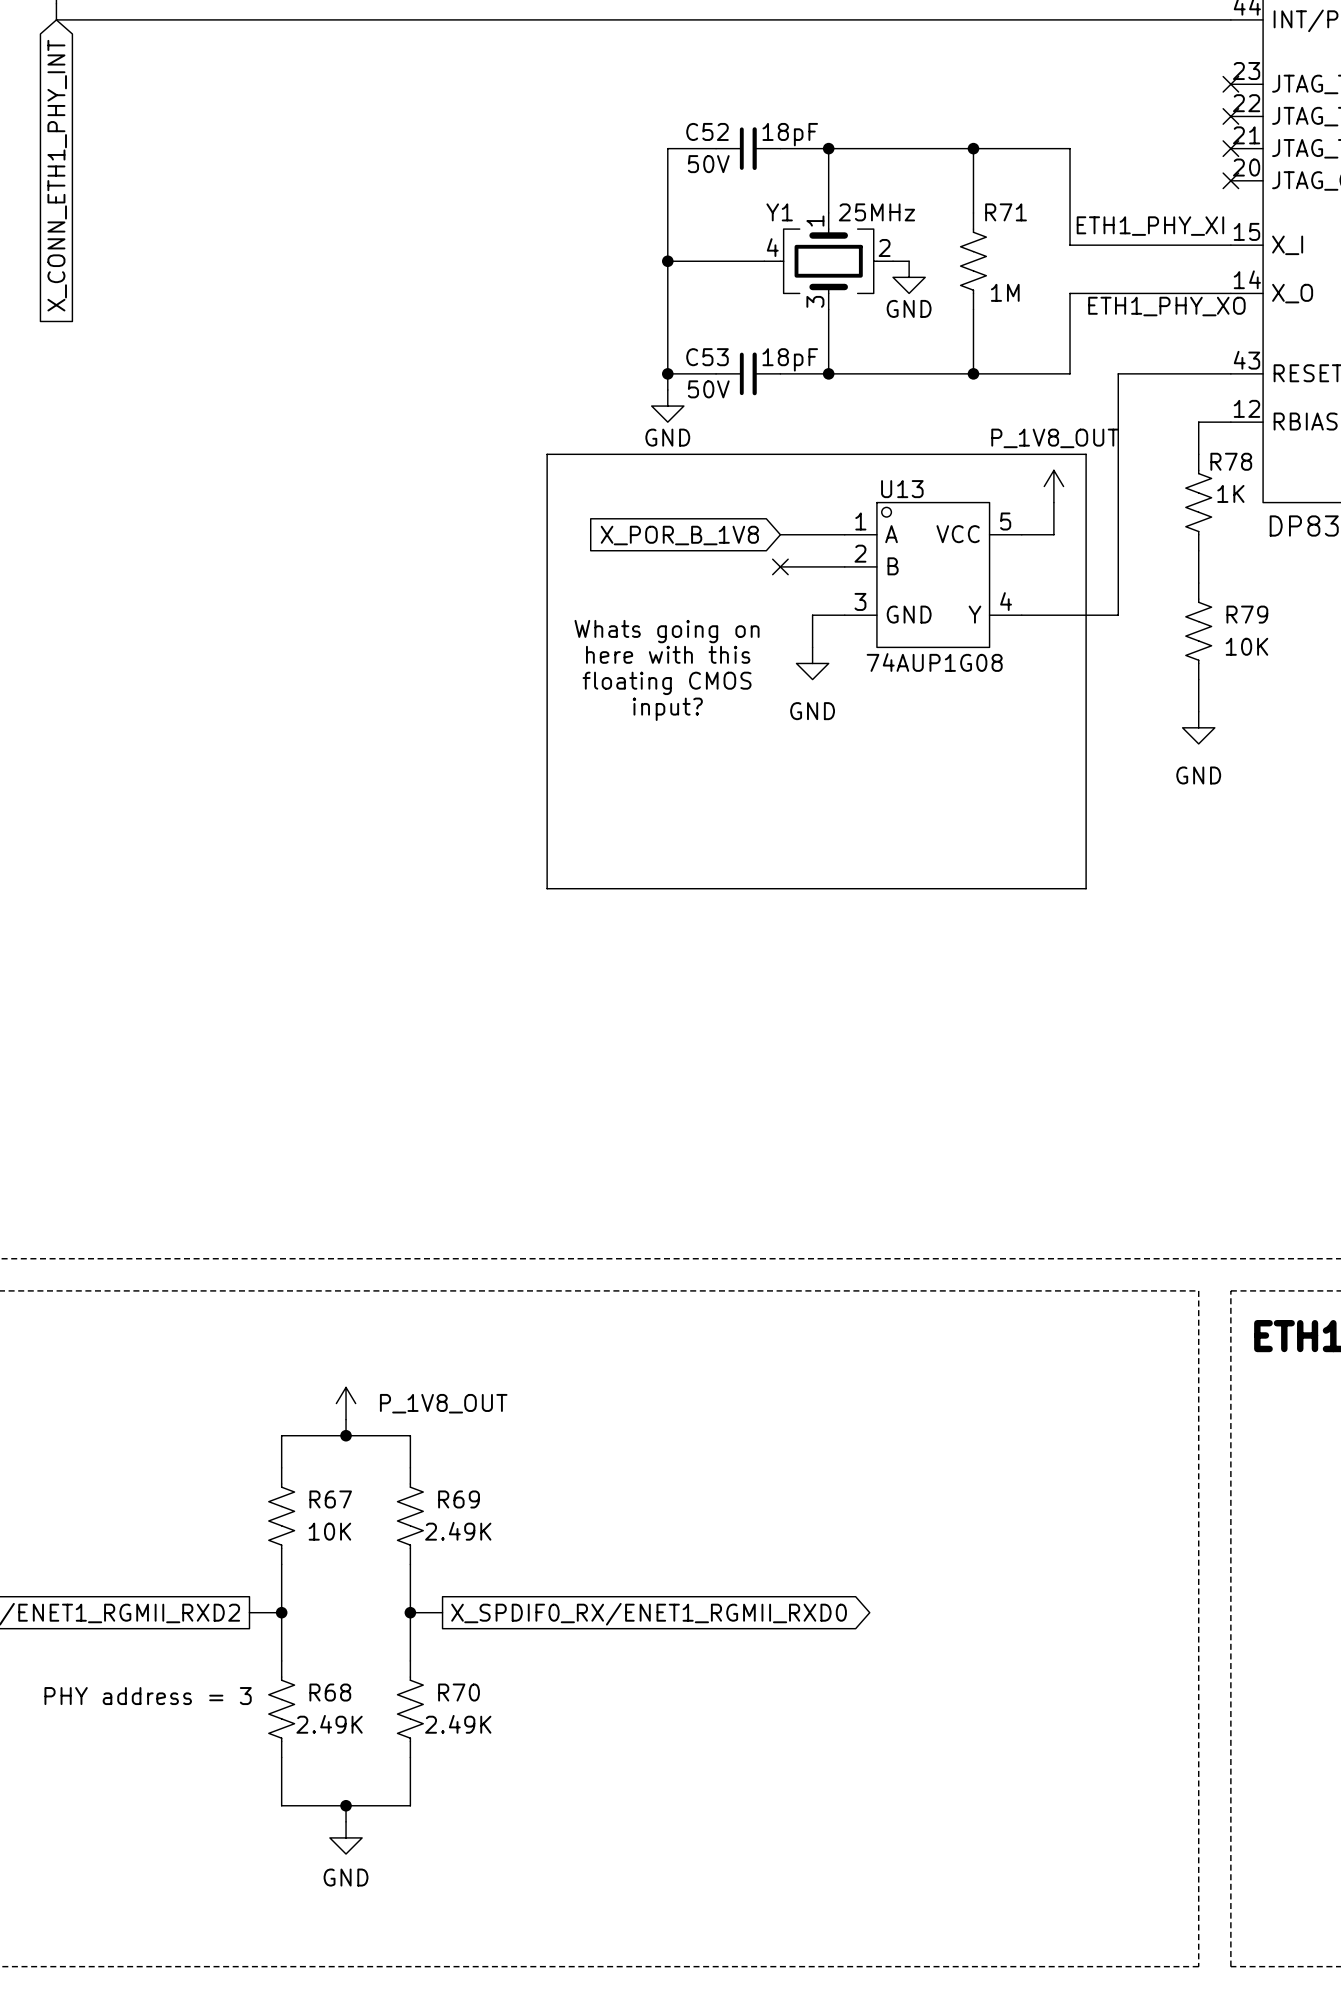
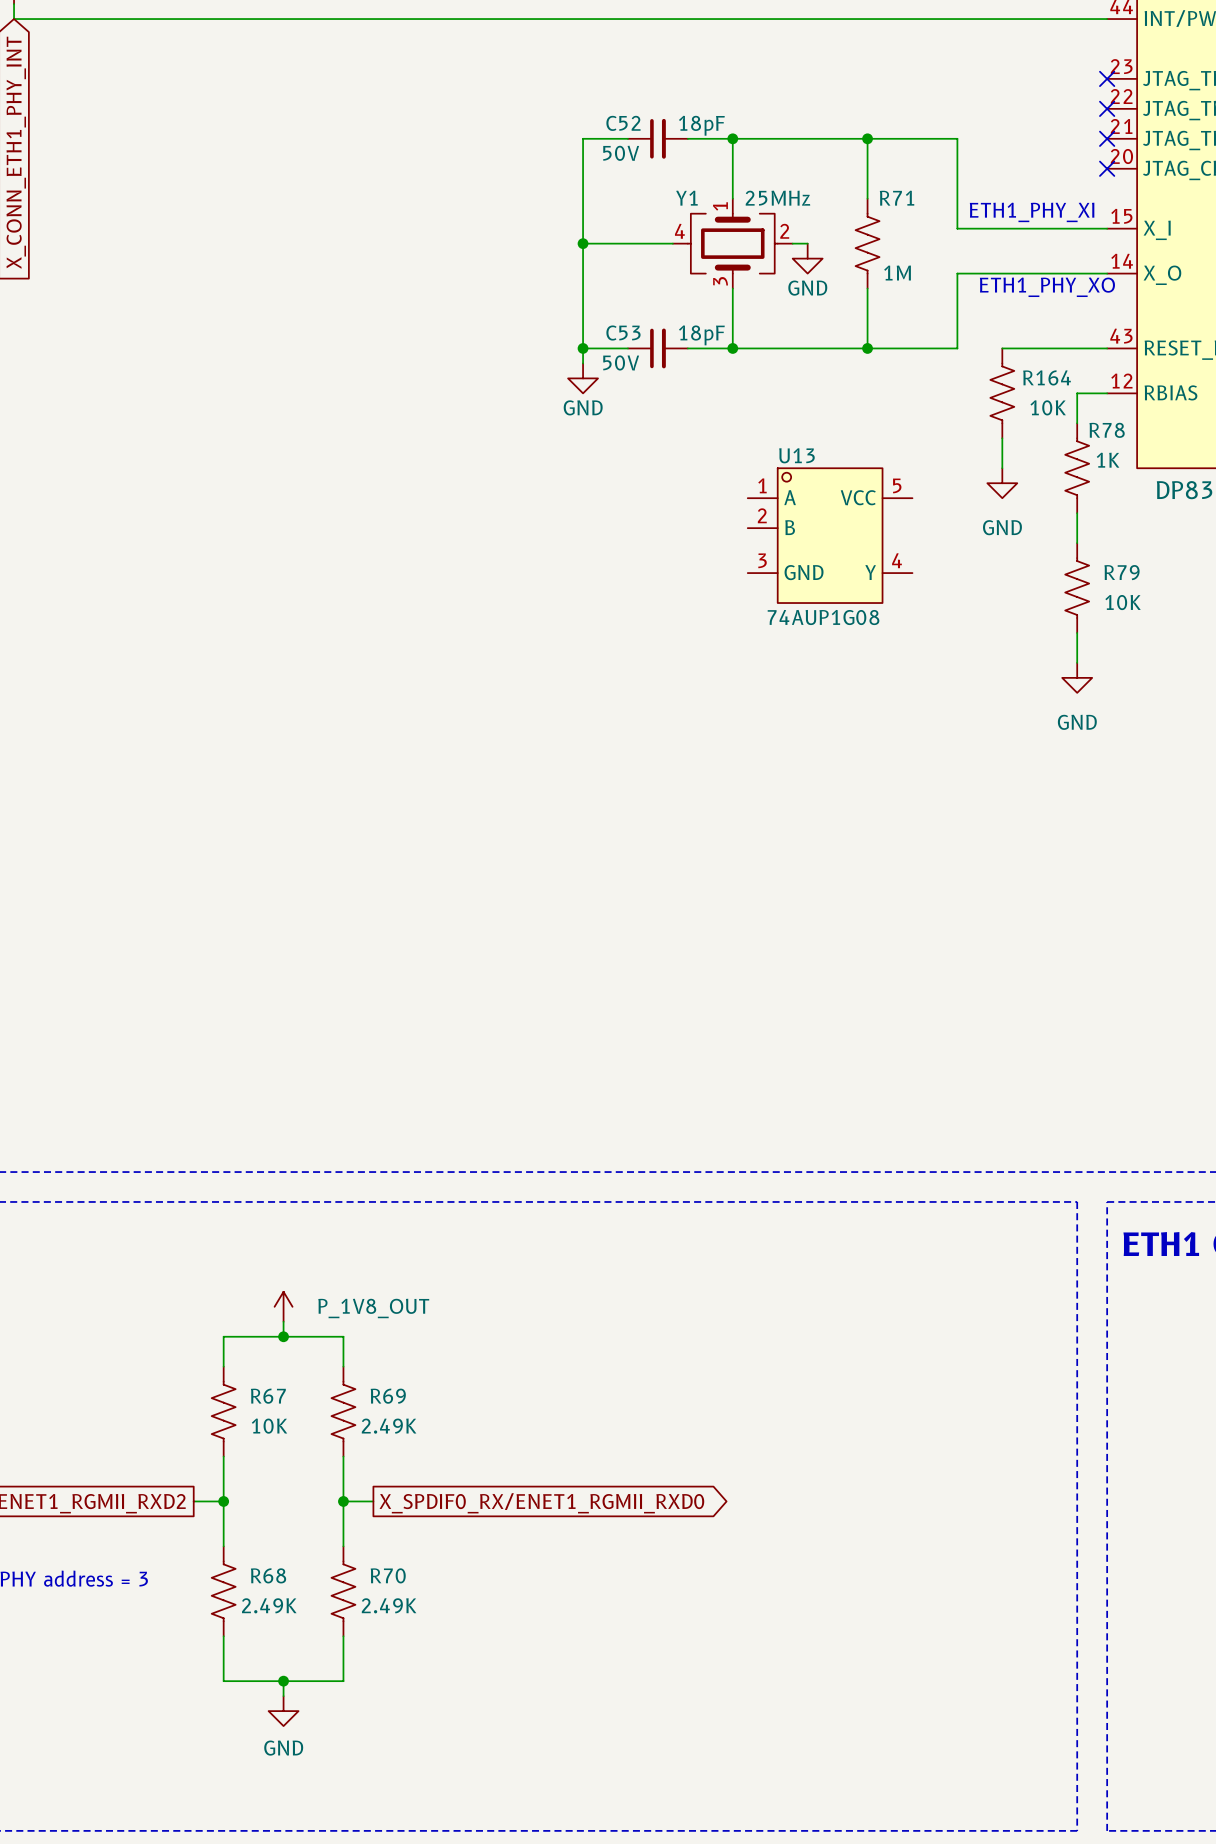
wire: (1118, 373) (1118, 470) -> none
R164: none -> 10K (1002, 393)
line: (547, 454) (1086, 454) (1086, 888) (547, 888) (547, 454) -> none
power symbol: P_1V8_OUT (1053, 486) -> none
wire: (1053, 502) (1053, 534) (1021, 534) -> none
wire: (1118, 502) (1118, 615) (1021, 615) -> none
power symbol: none -> GND (1002, 483)
wire: (780, 534) (844, 534) -> none
global label: X_POR_B_1V8 (679, 535) -> none
wire: (780, 566) (844, 566) -> none
no-connect mark: (780, 566) -> none
wire: (844, 615) (812, 615) (812, 647) -> none
text: Whats going on (667, 631) -> none
text: here with this (668, 654) -> none
power symbol: GND (812, 663) -> none
text: floating CMOS (667, 683) -> none
text: input? (667, 709) -> none

